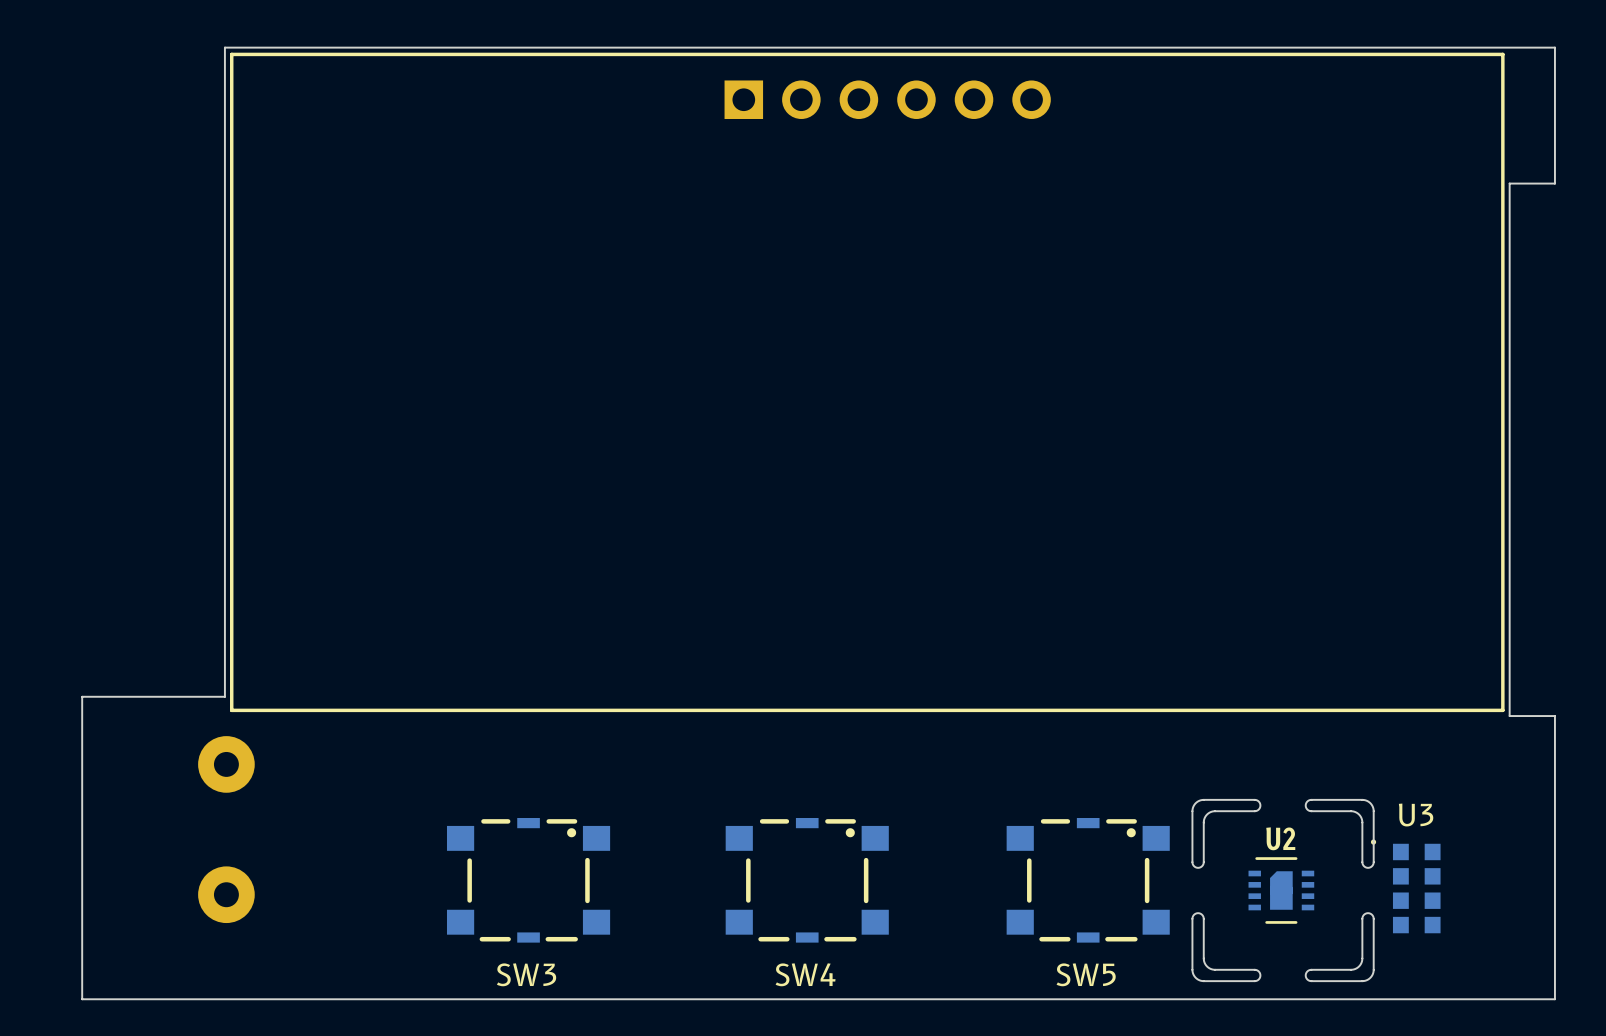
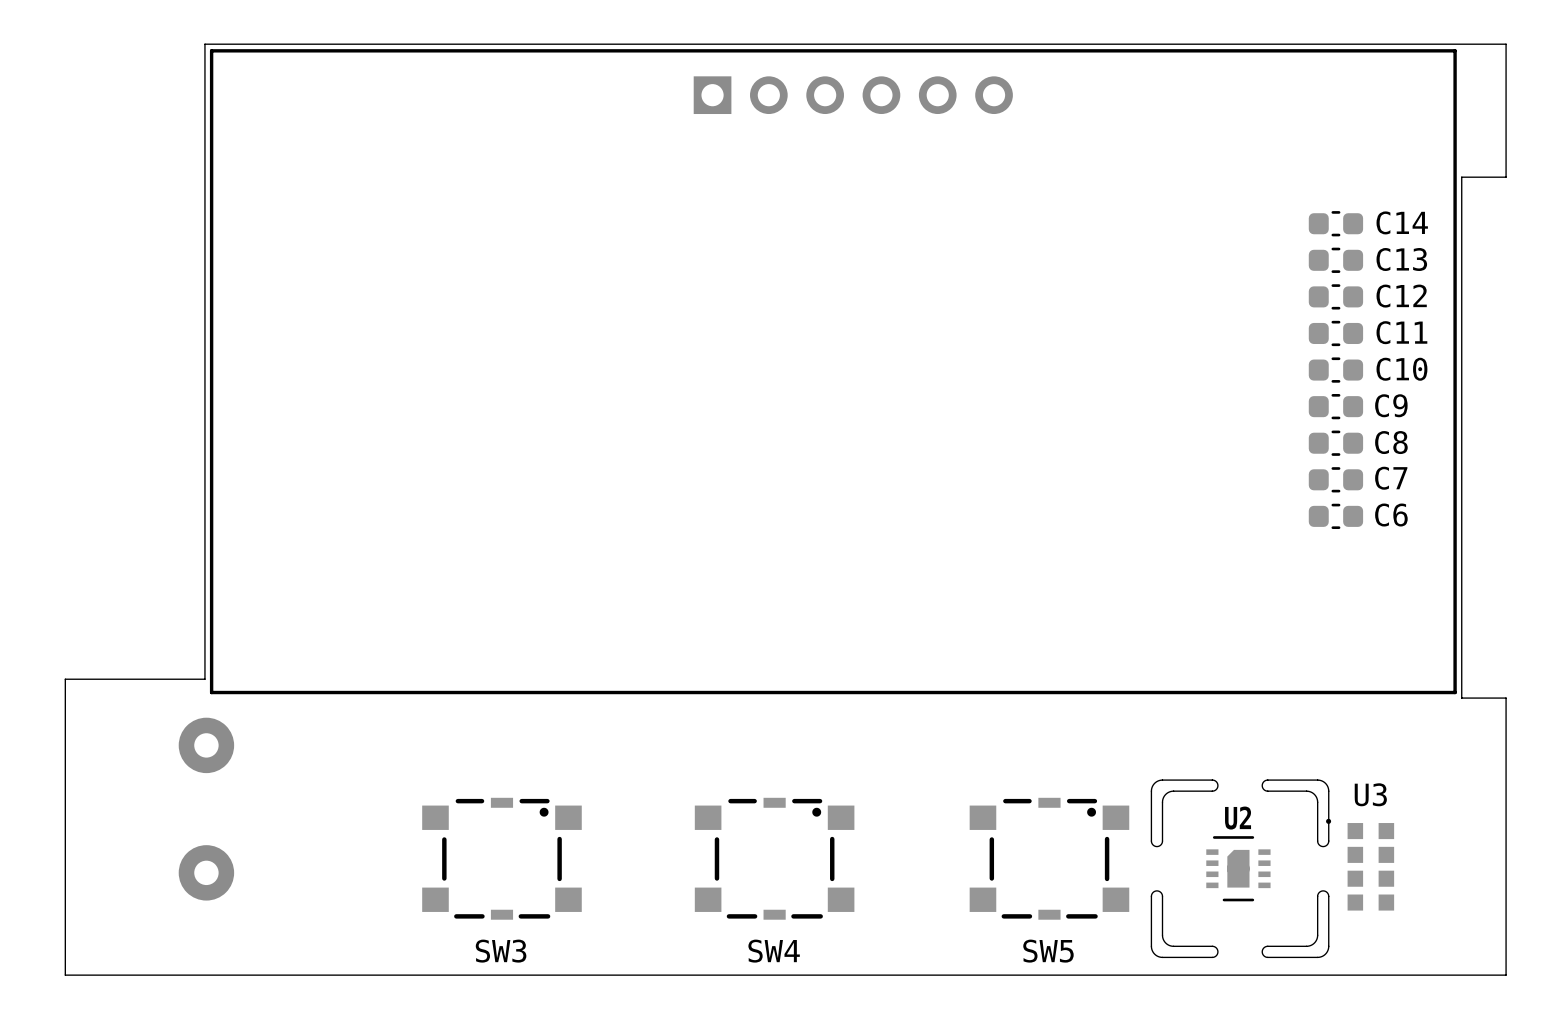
C14: none -> (1335, 223)
C13: none -> (1335, 260)
C12: none -> (1335, 296)
C11: none -> (1335, 333)
C10: none -> (1335, 370)
C9: none -> (1335, 406)
C8: none -> (1335, 443)
C7: none -> (1335, 479)
C6: none -> (1335, 516)

